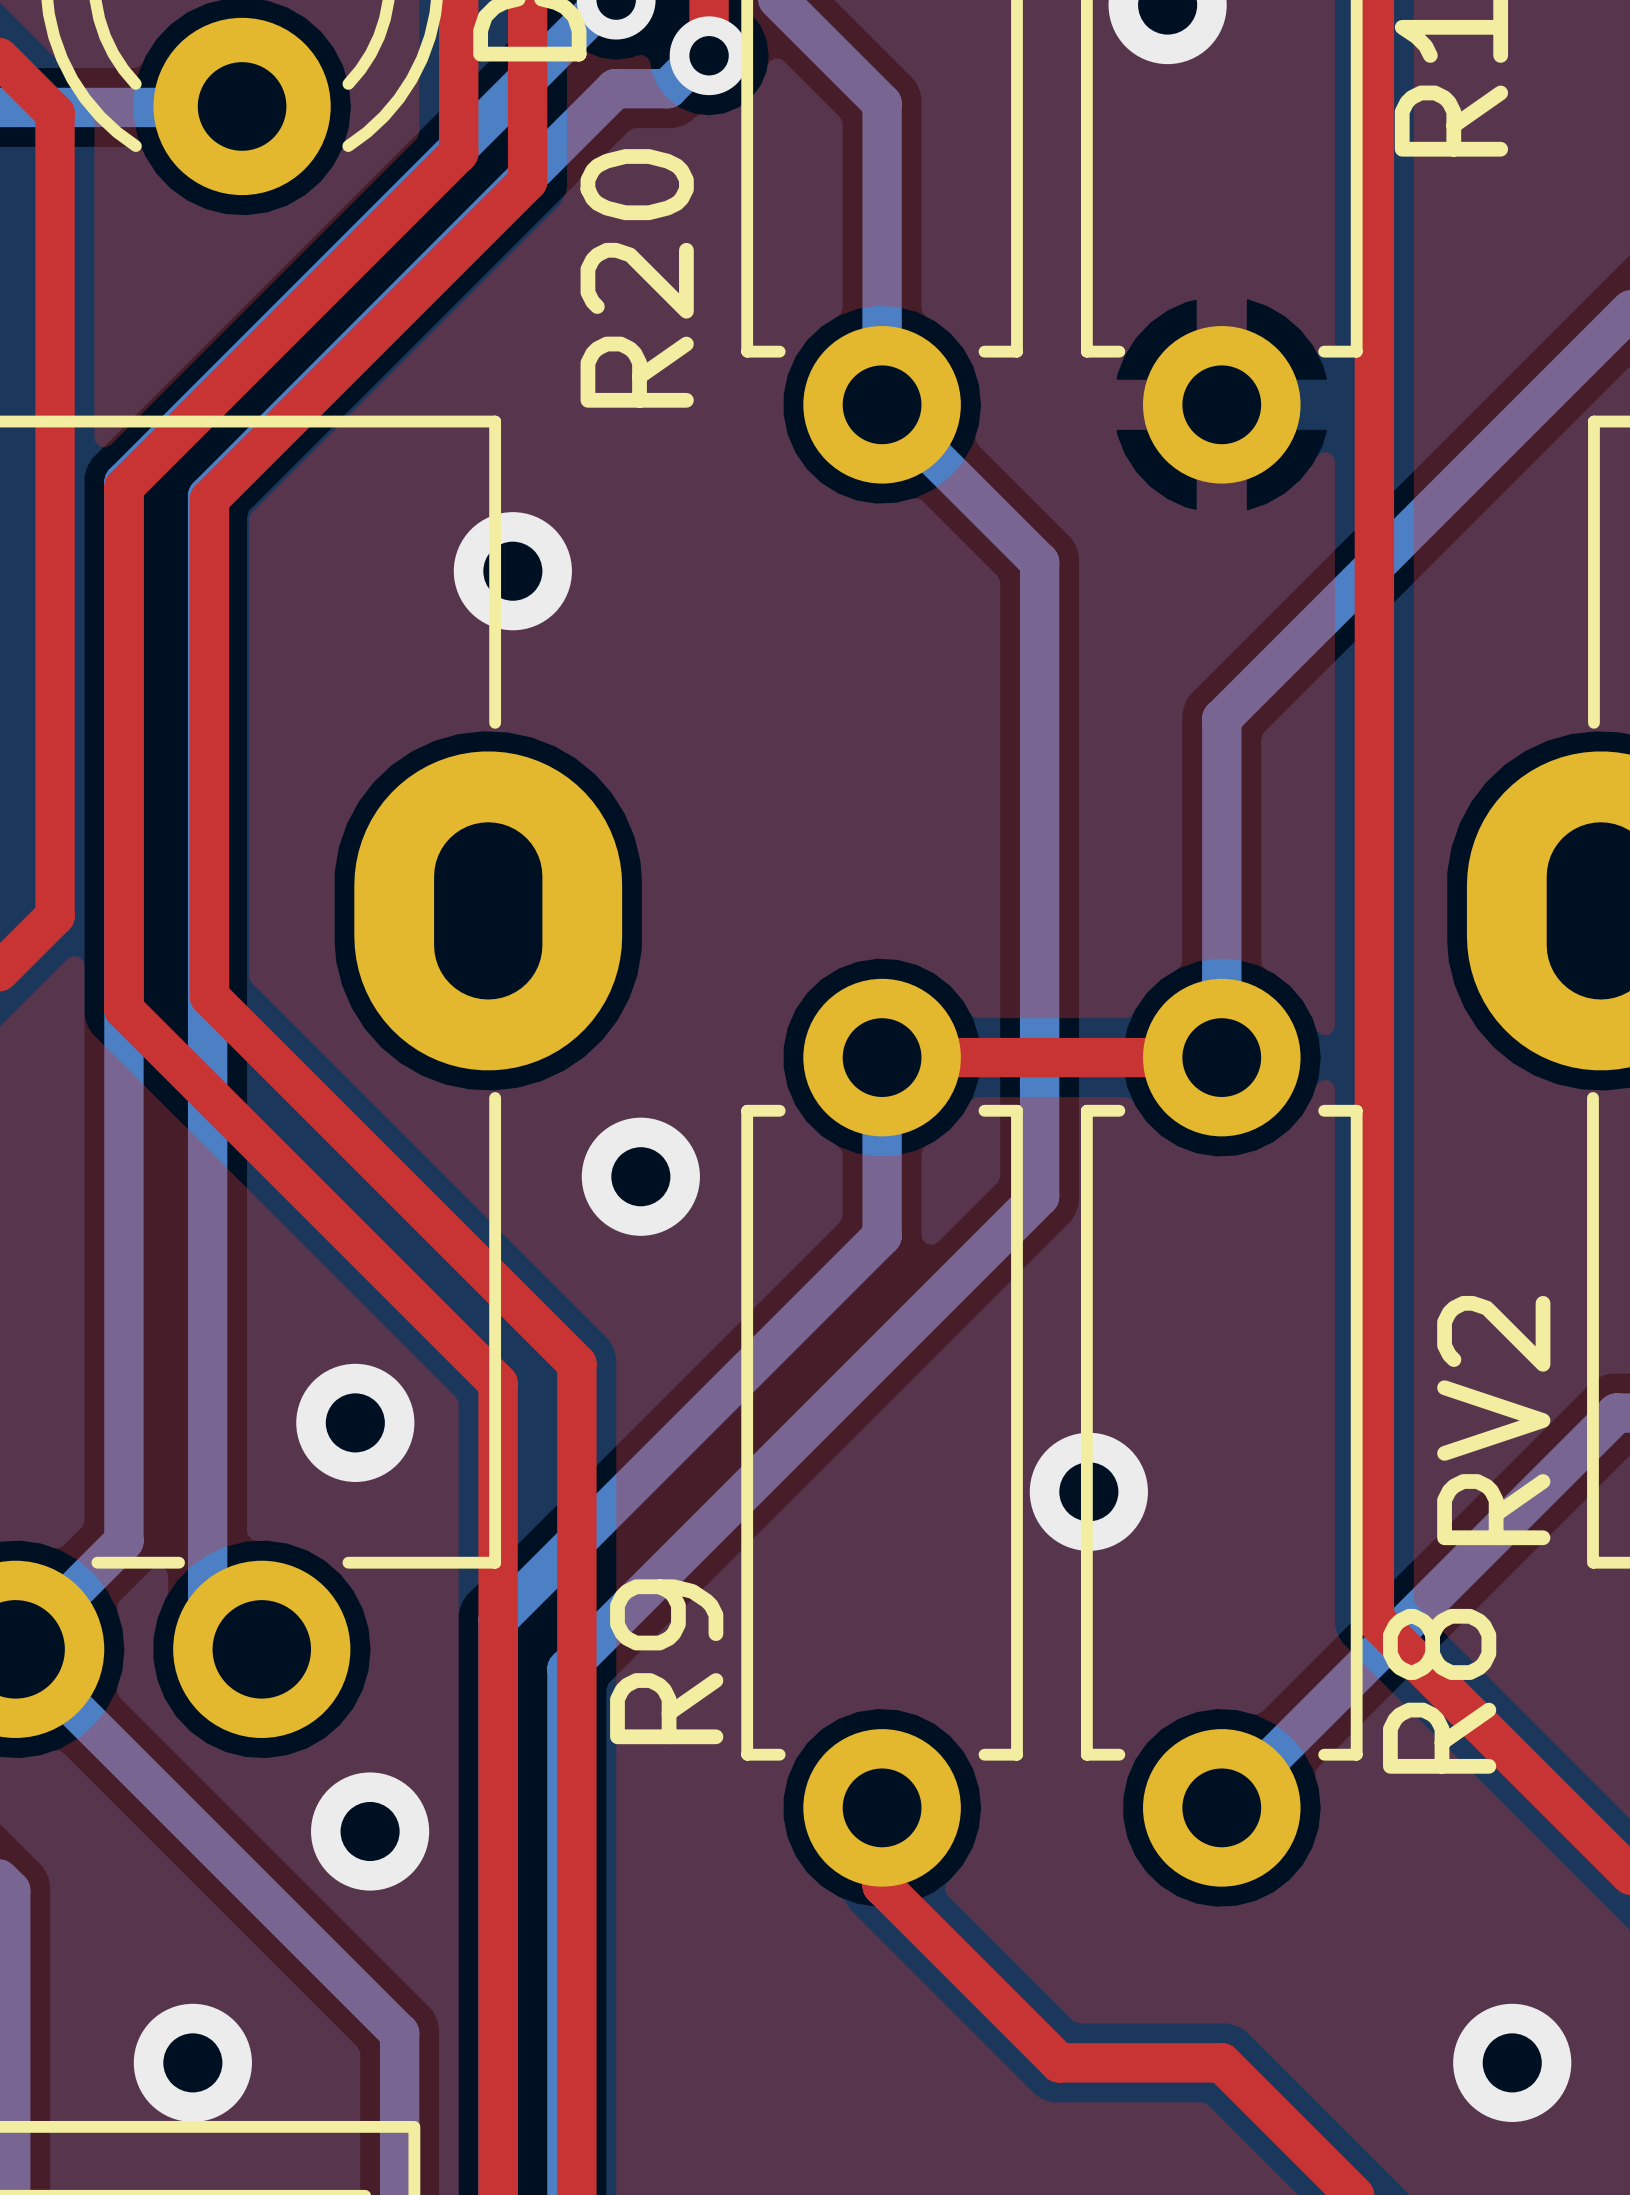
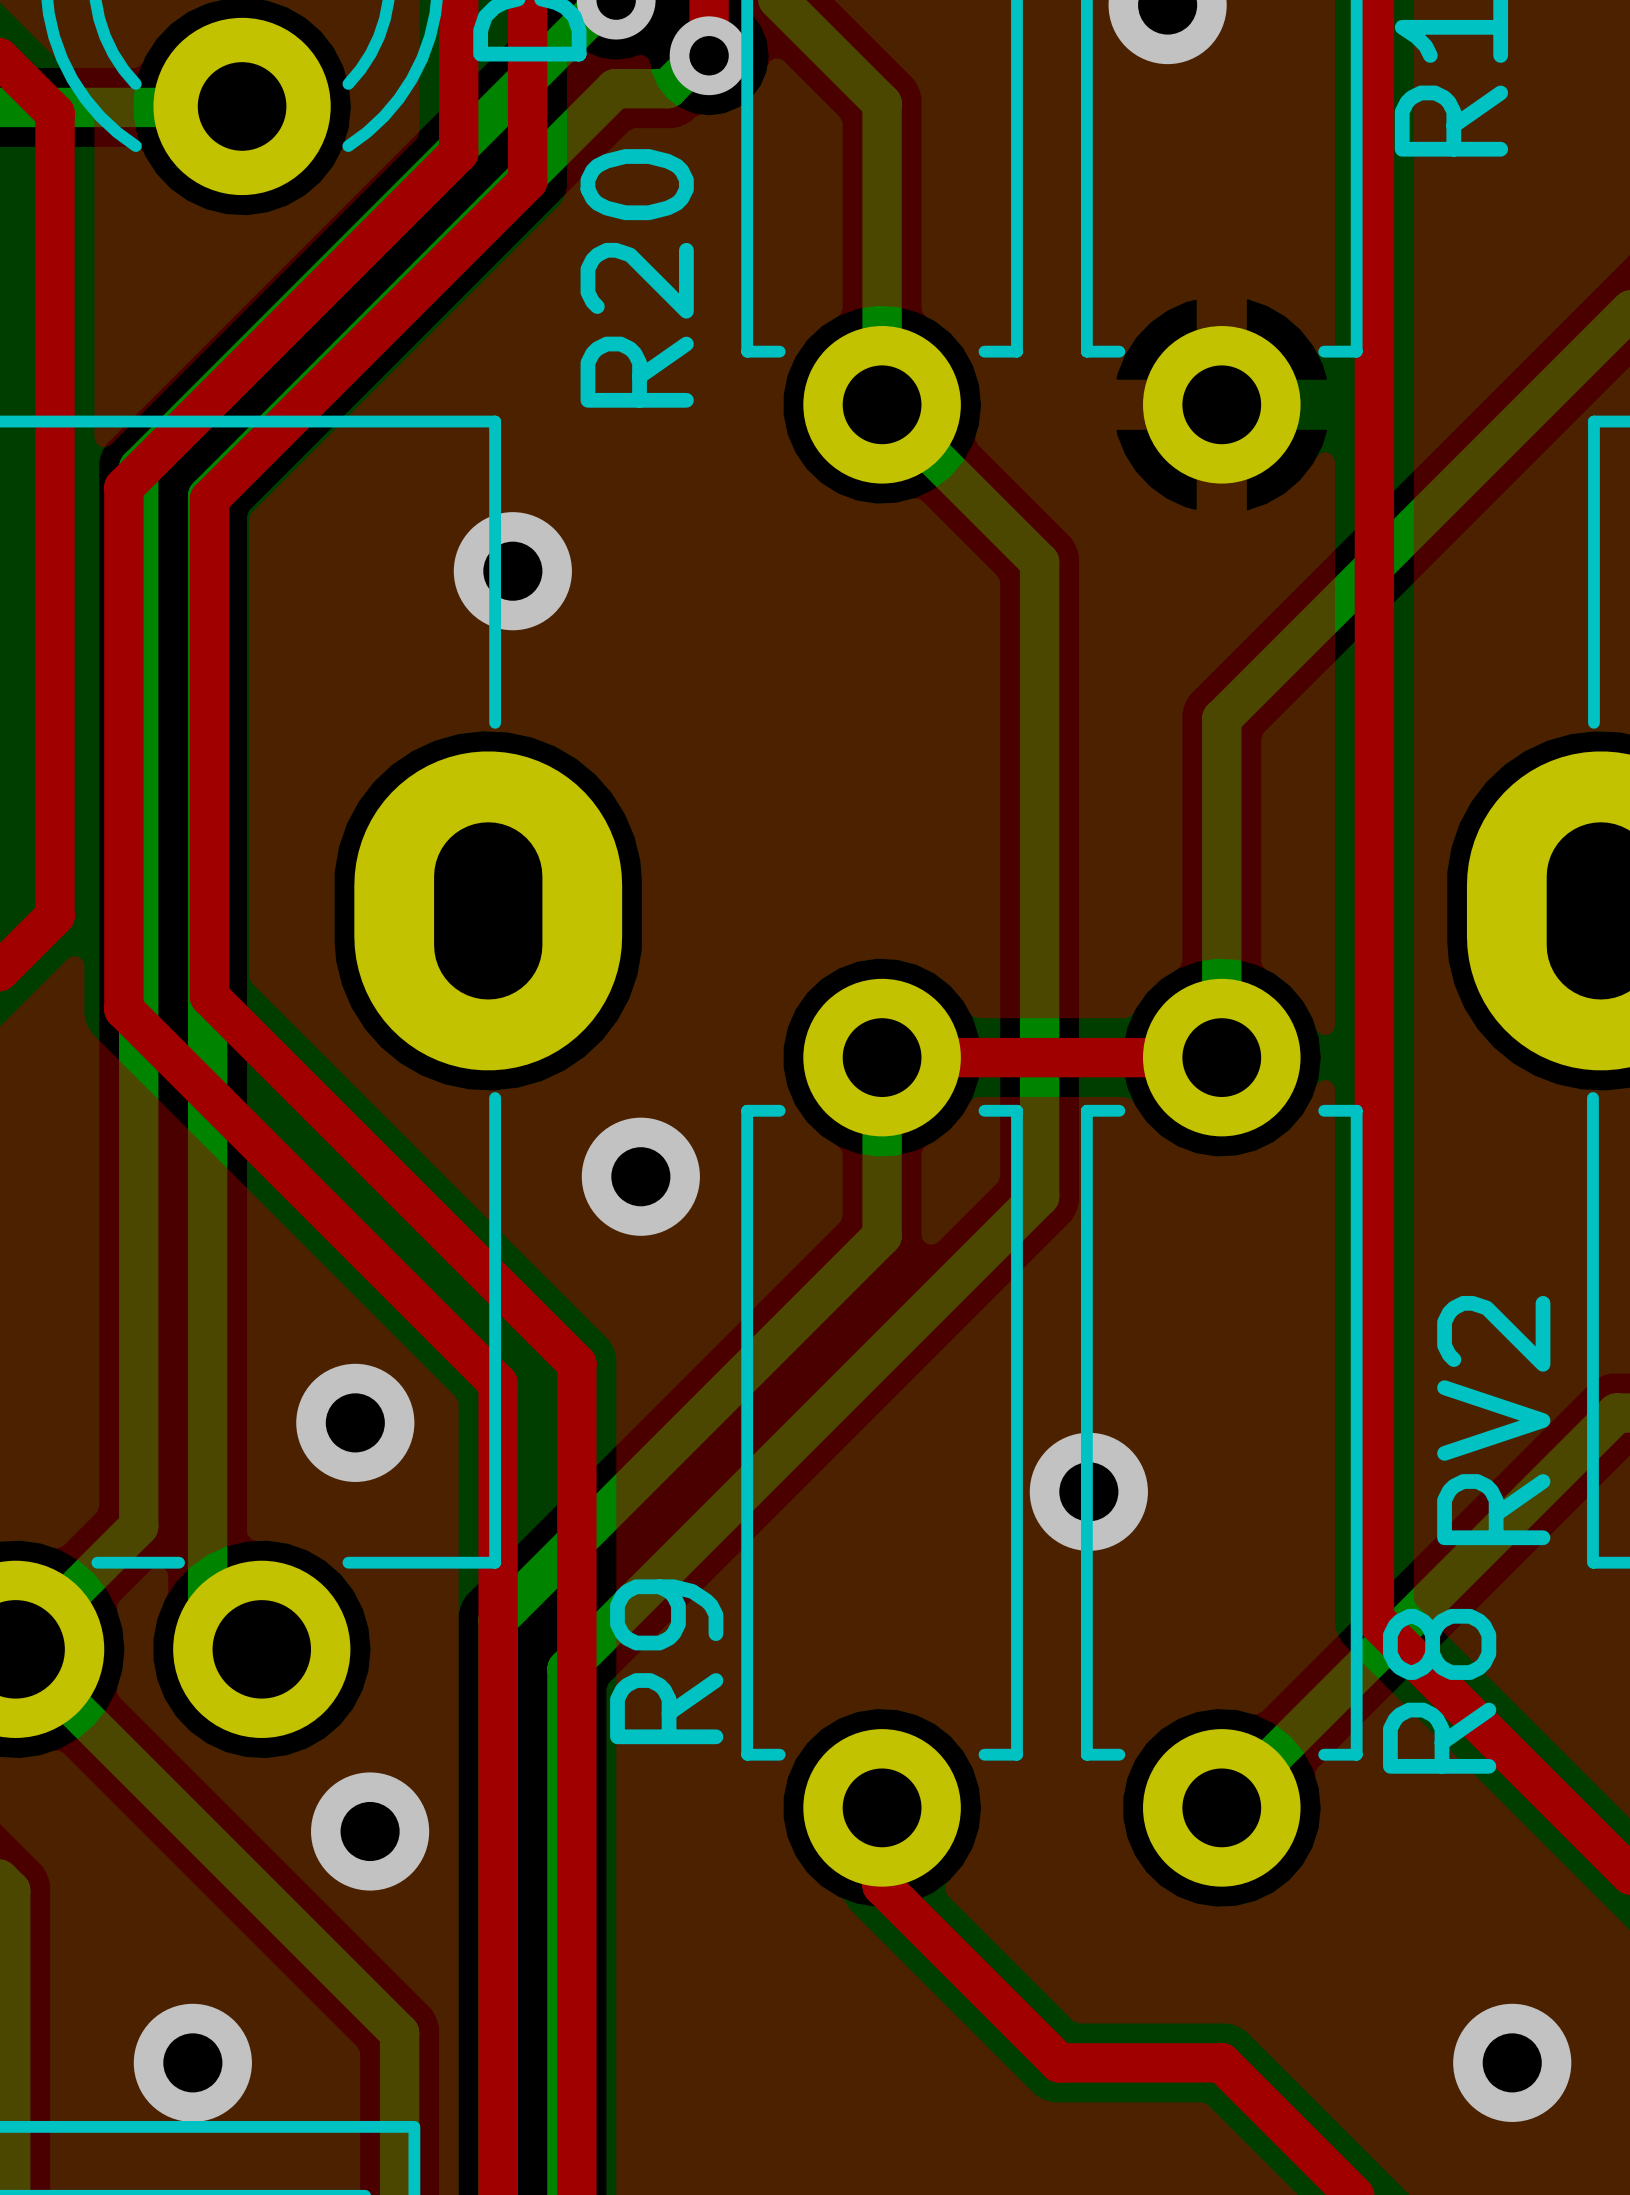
bottom track: (138, 467) (123, 482) (123, 1541) -> (138, 467) (138, 1526) (123, 1541)

